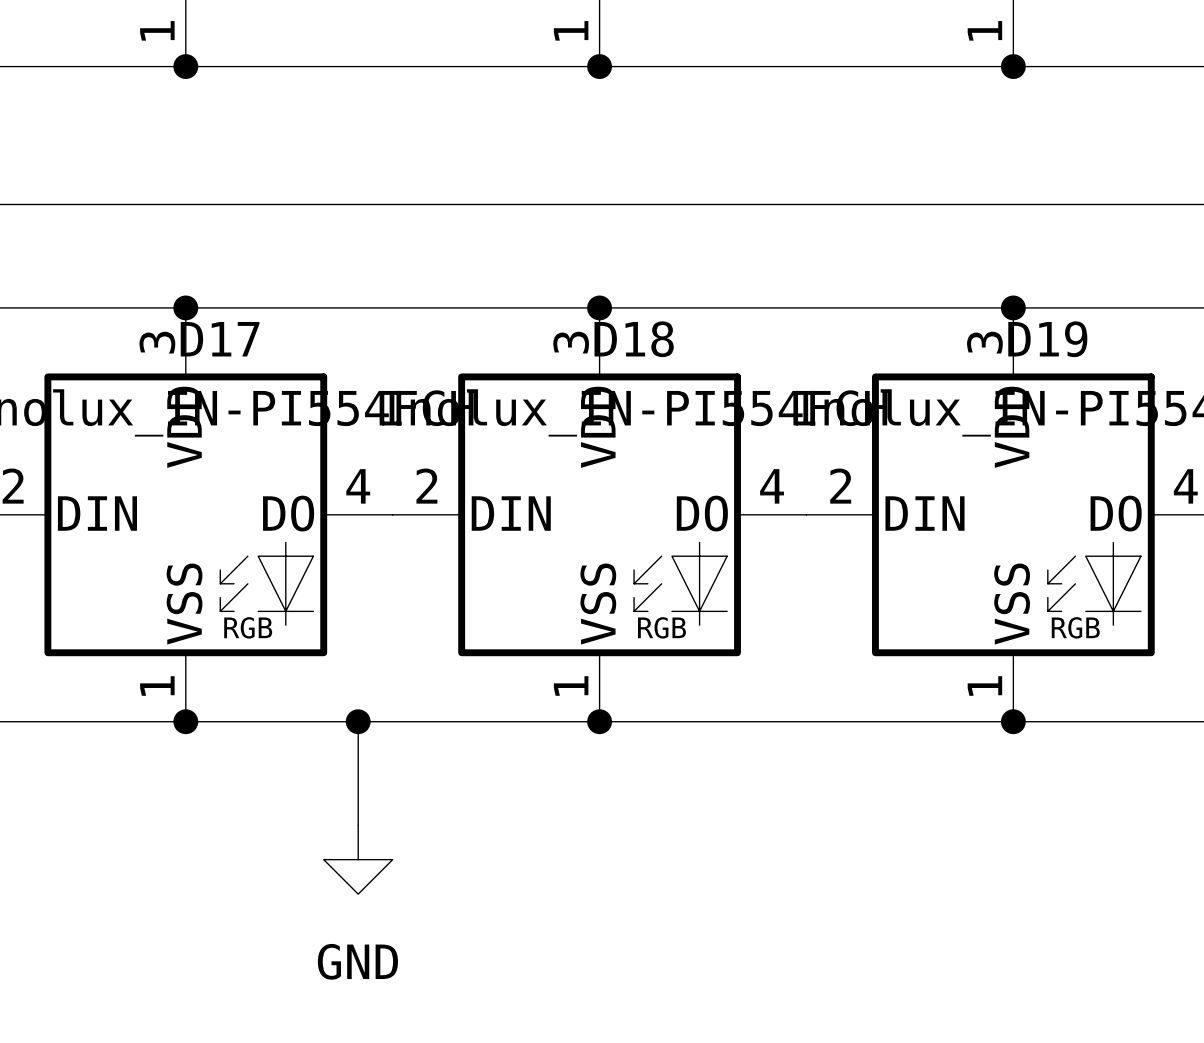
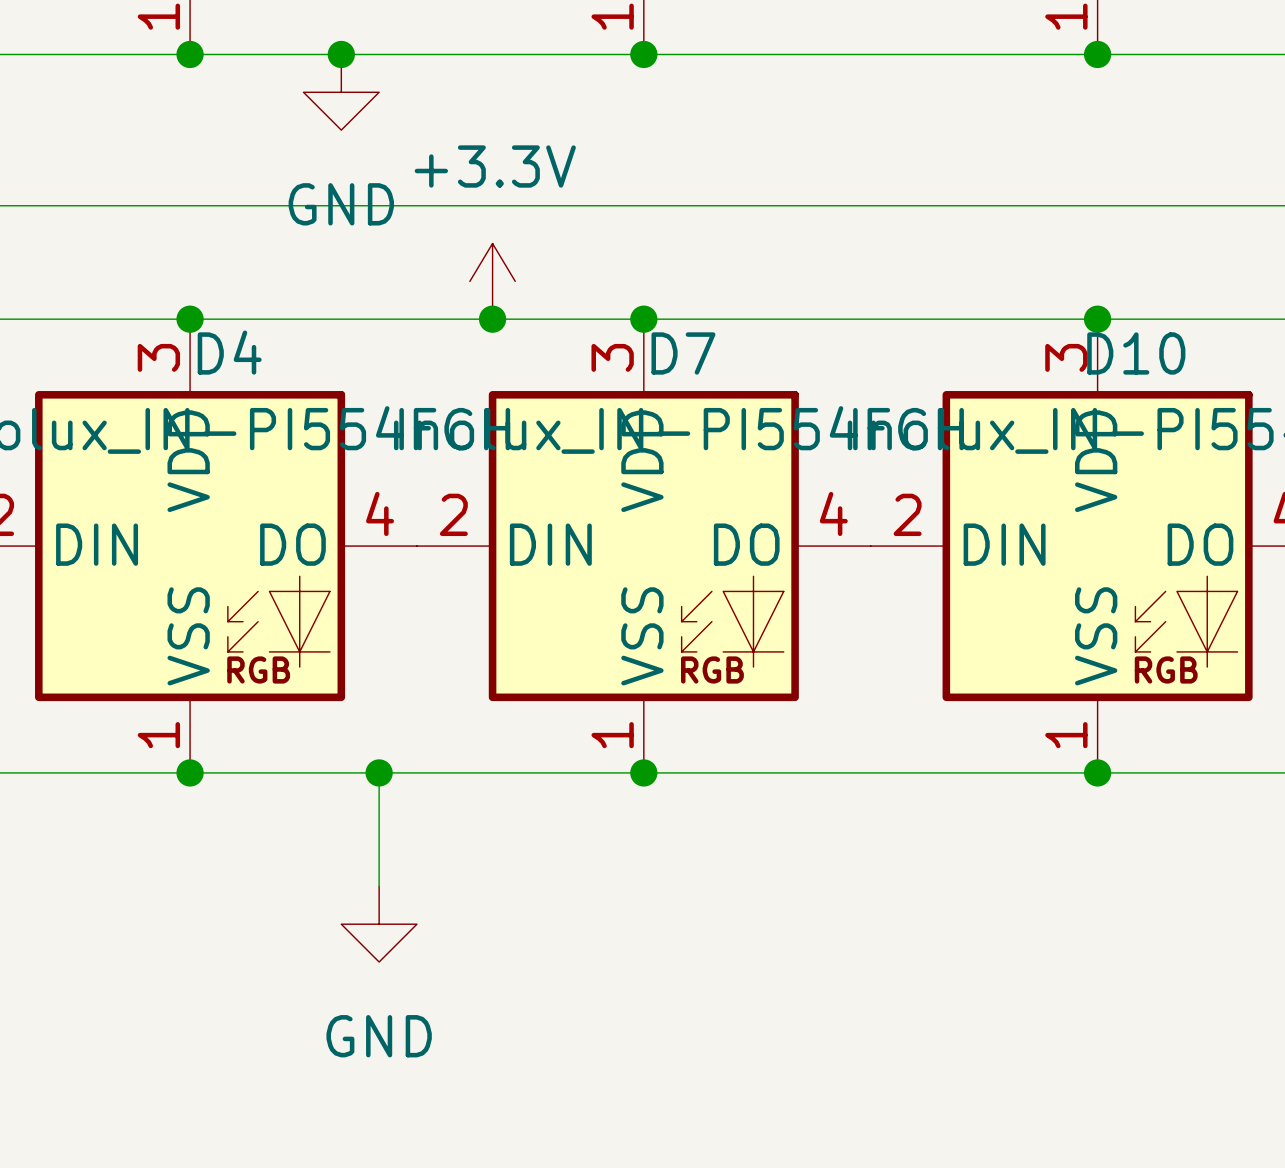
junction: none -> (341, 54)
power symbol: none -> GND (341, 92)
power symbol: none -> +3.3V (492, 281)
junction: none -> (492, 319)
D17 name: D17 (220, 339) -> D4 (229, 352)
D18 name: D18 (634, 339) -> D7 (683, 353)
D19 name: D19 (1047, 339) -> D10 (1136, 353)

